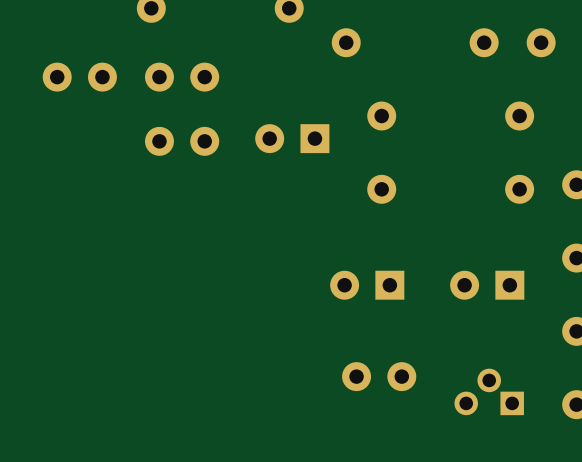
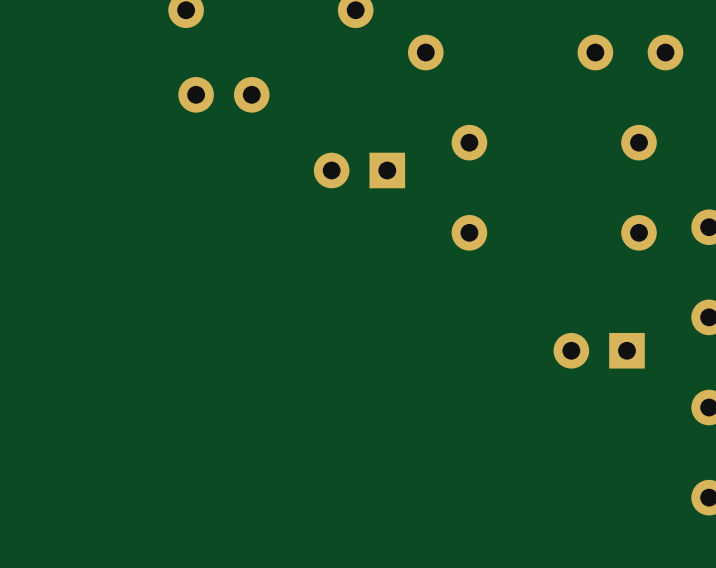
part: (79, 77) -> none
part: (182, 141) -> none
part: (367, 285) -> none
part: (379, 376) -> none
part: (489, 391) -> none

